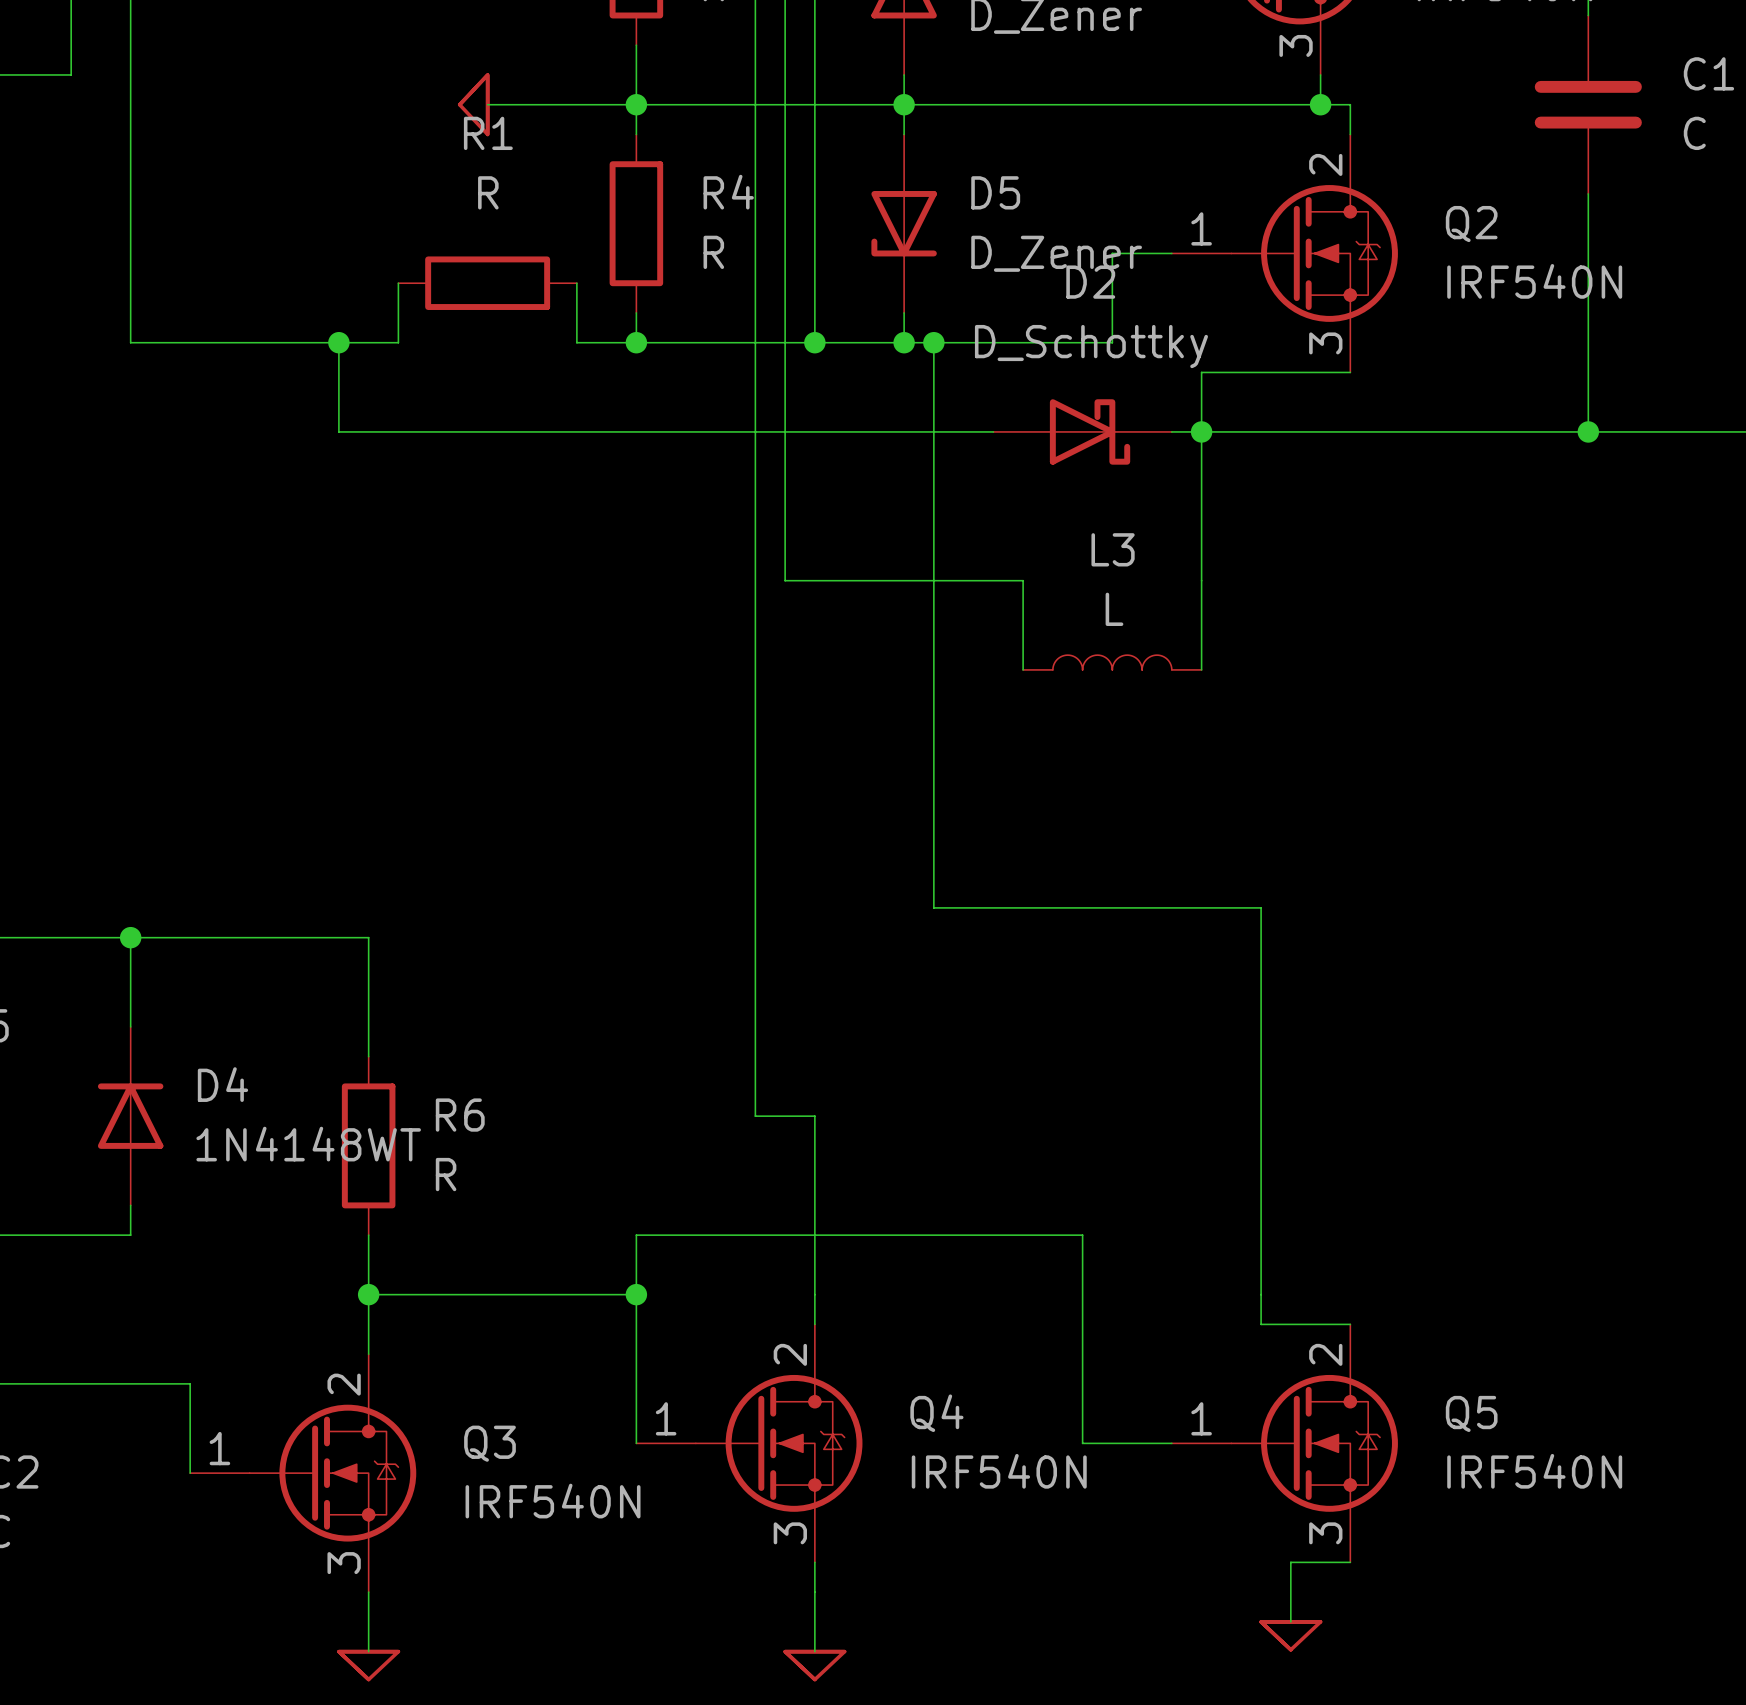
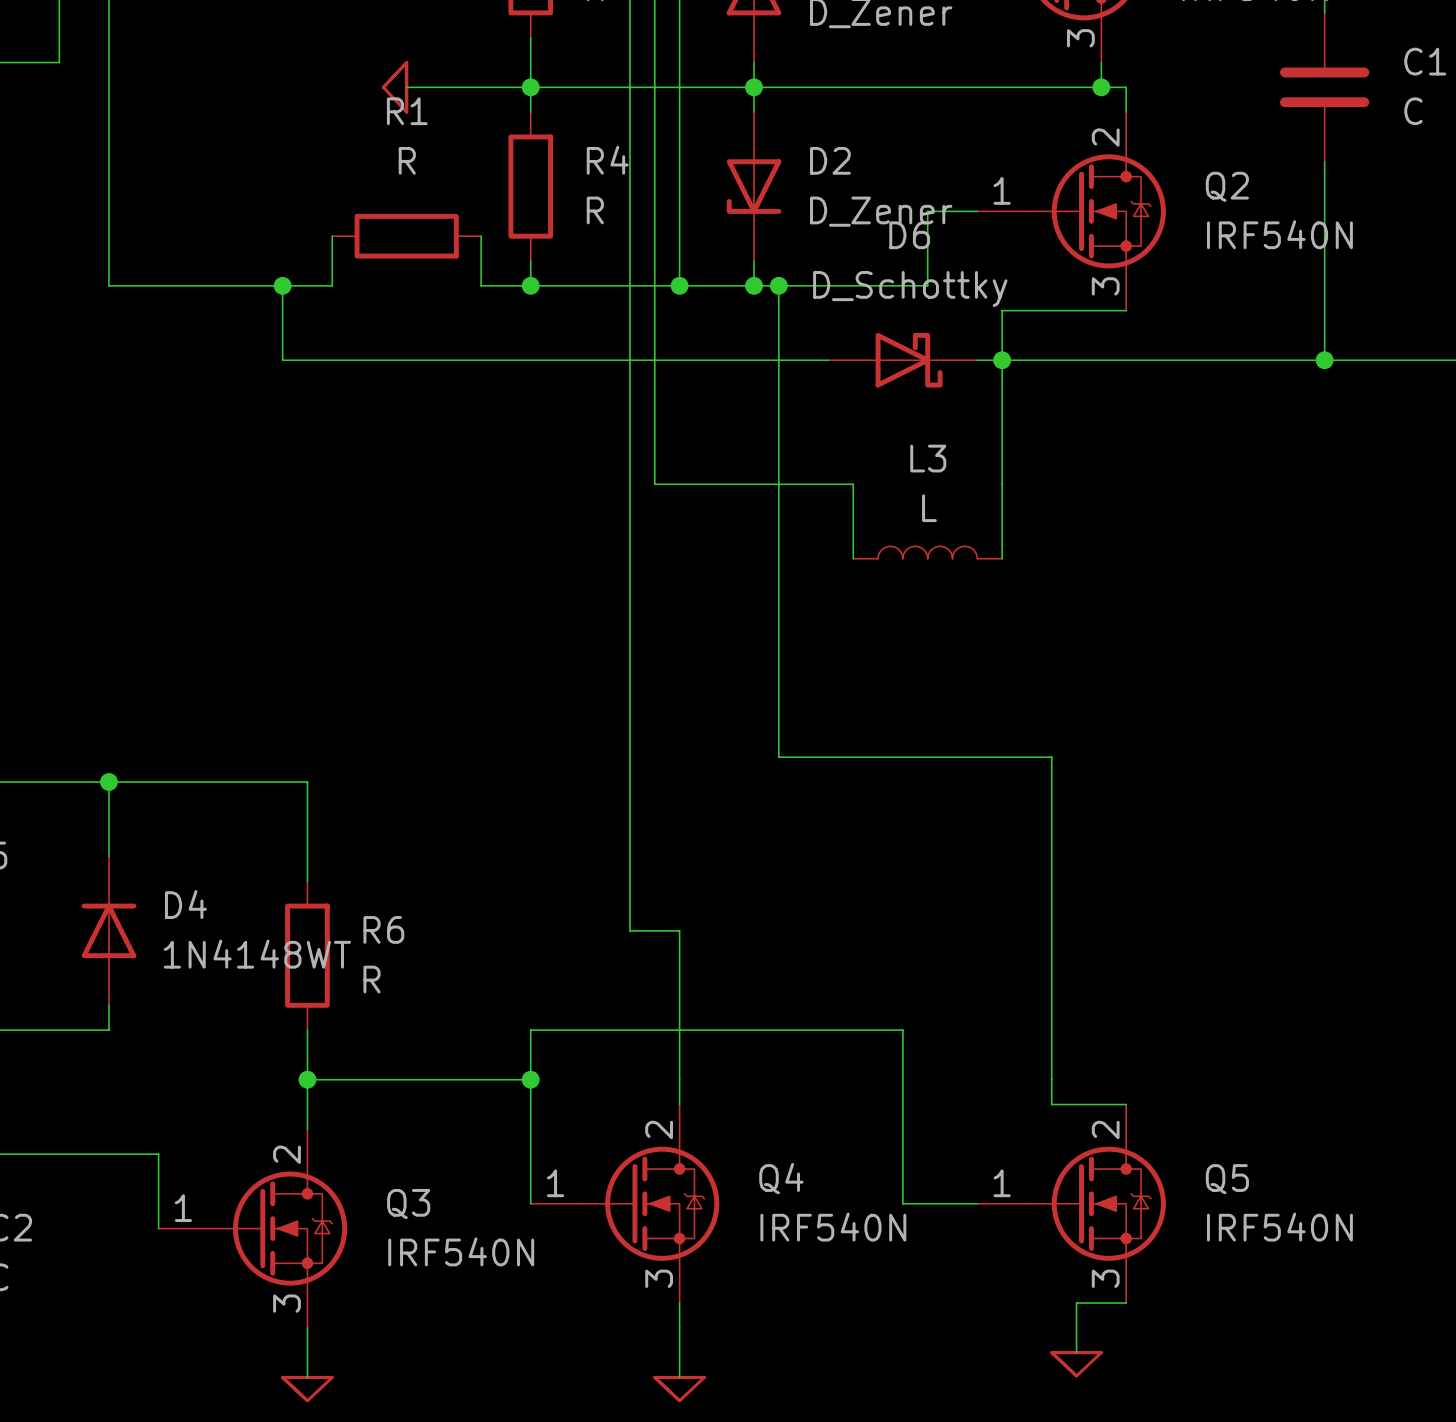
D5 name: D5 (995, 192) -> D2 (830, 160)
D2 name: D2 (1090, 282) -> D6 (909, 235)

